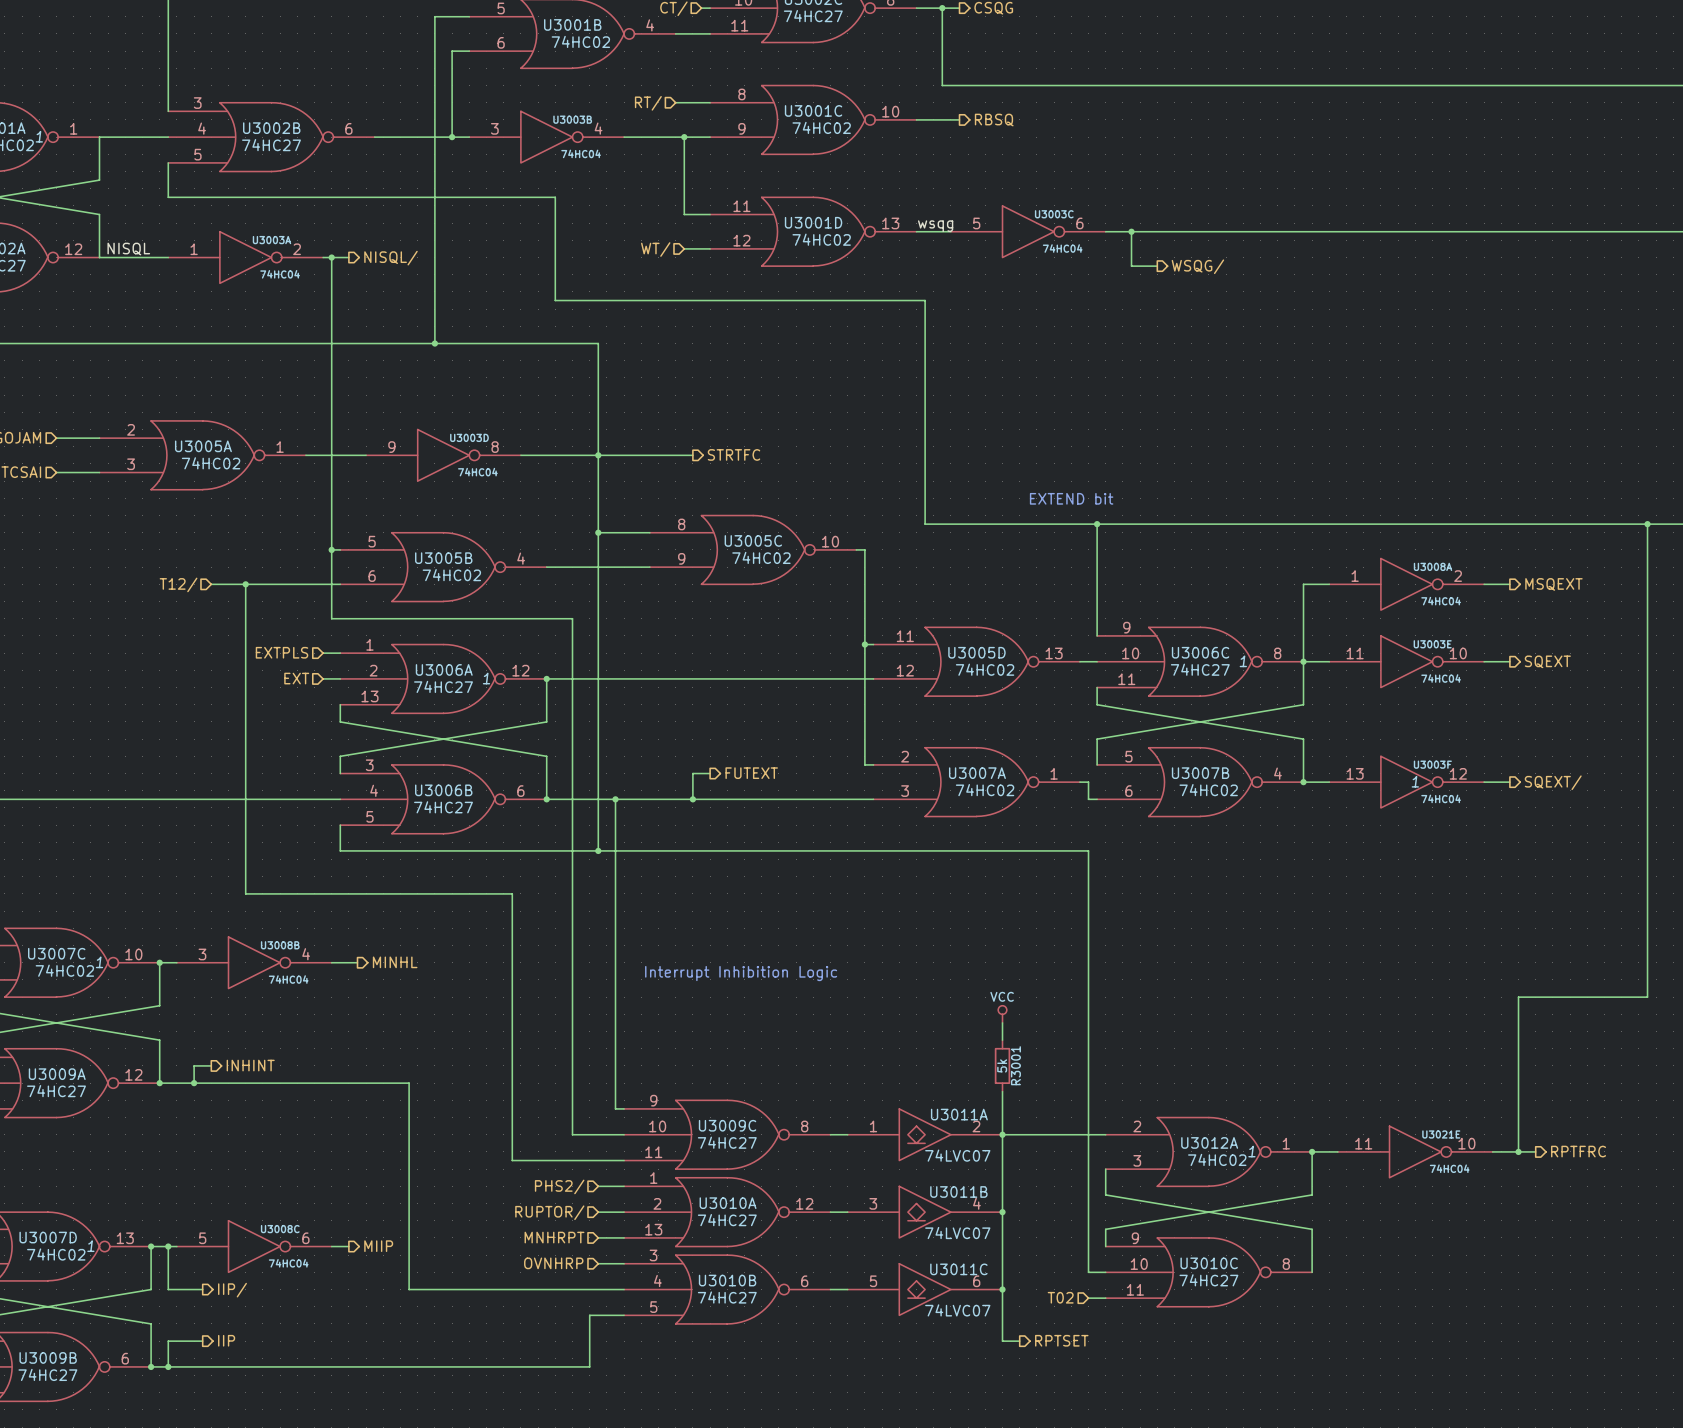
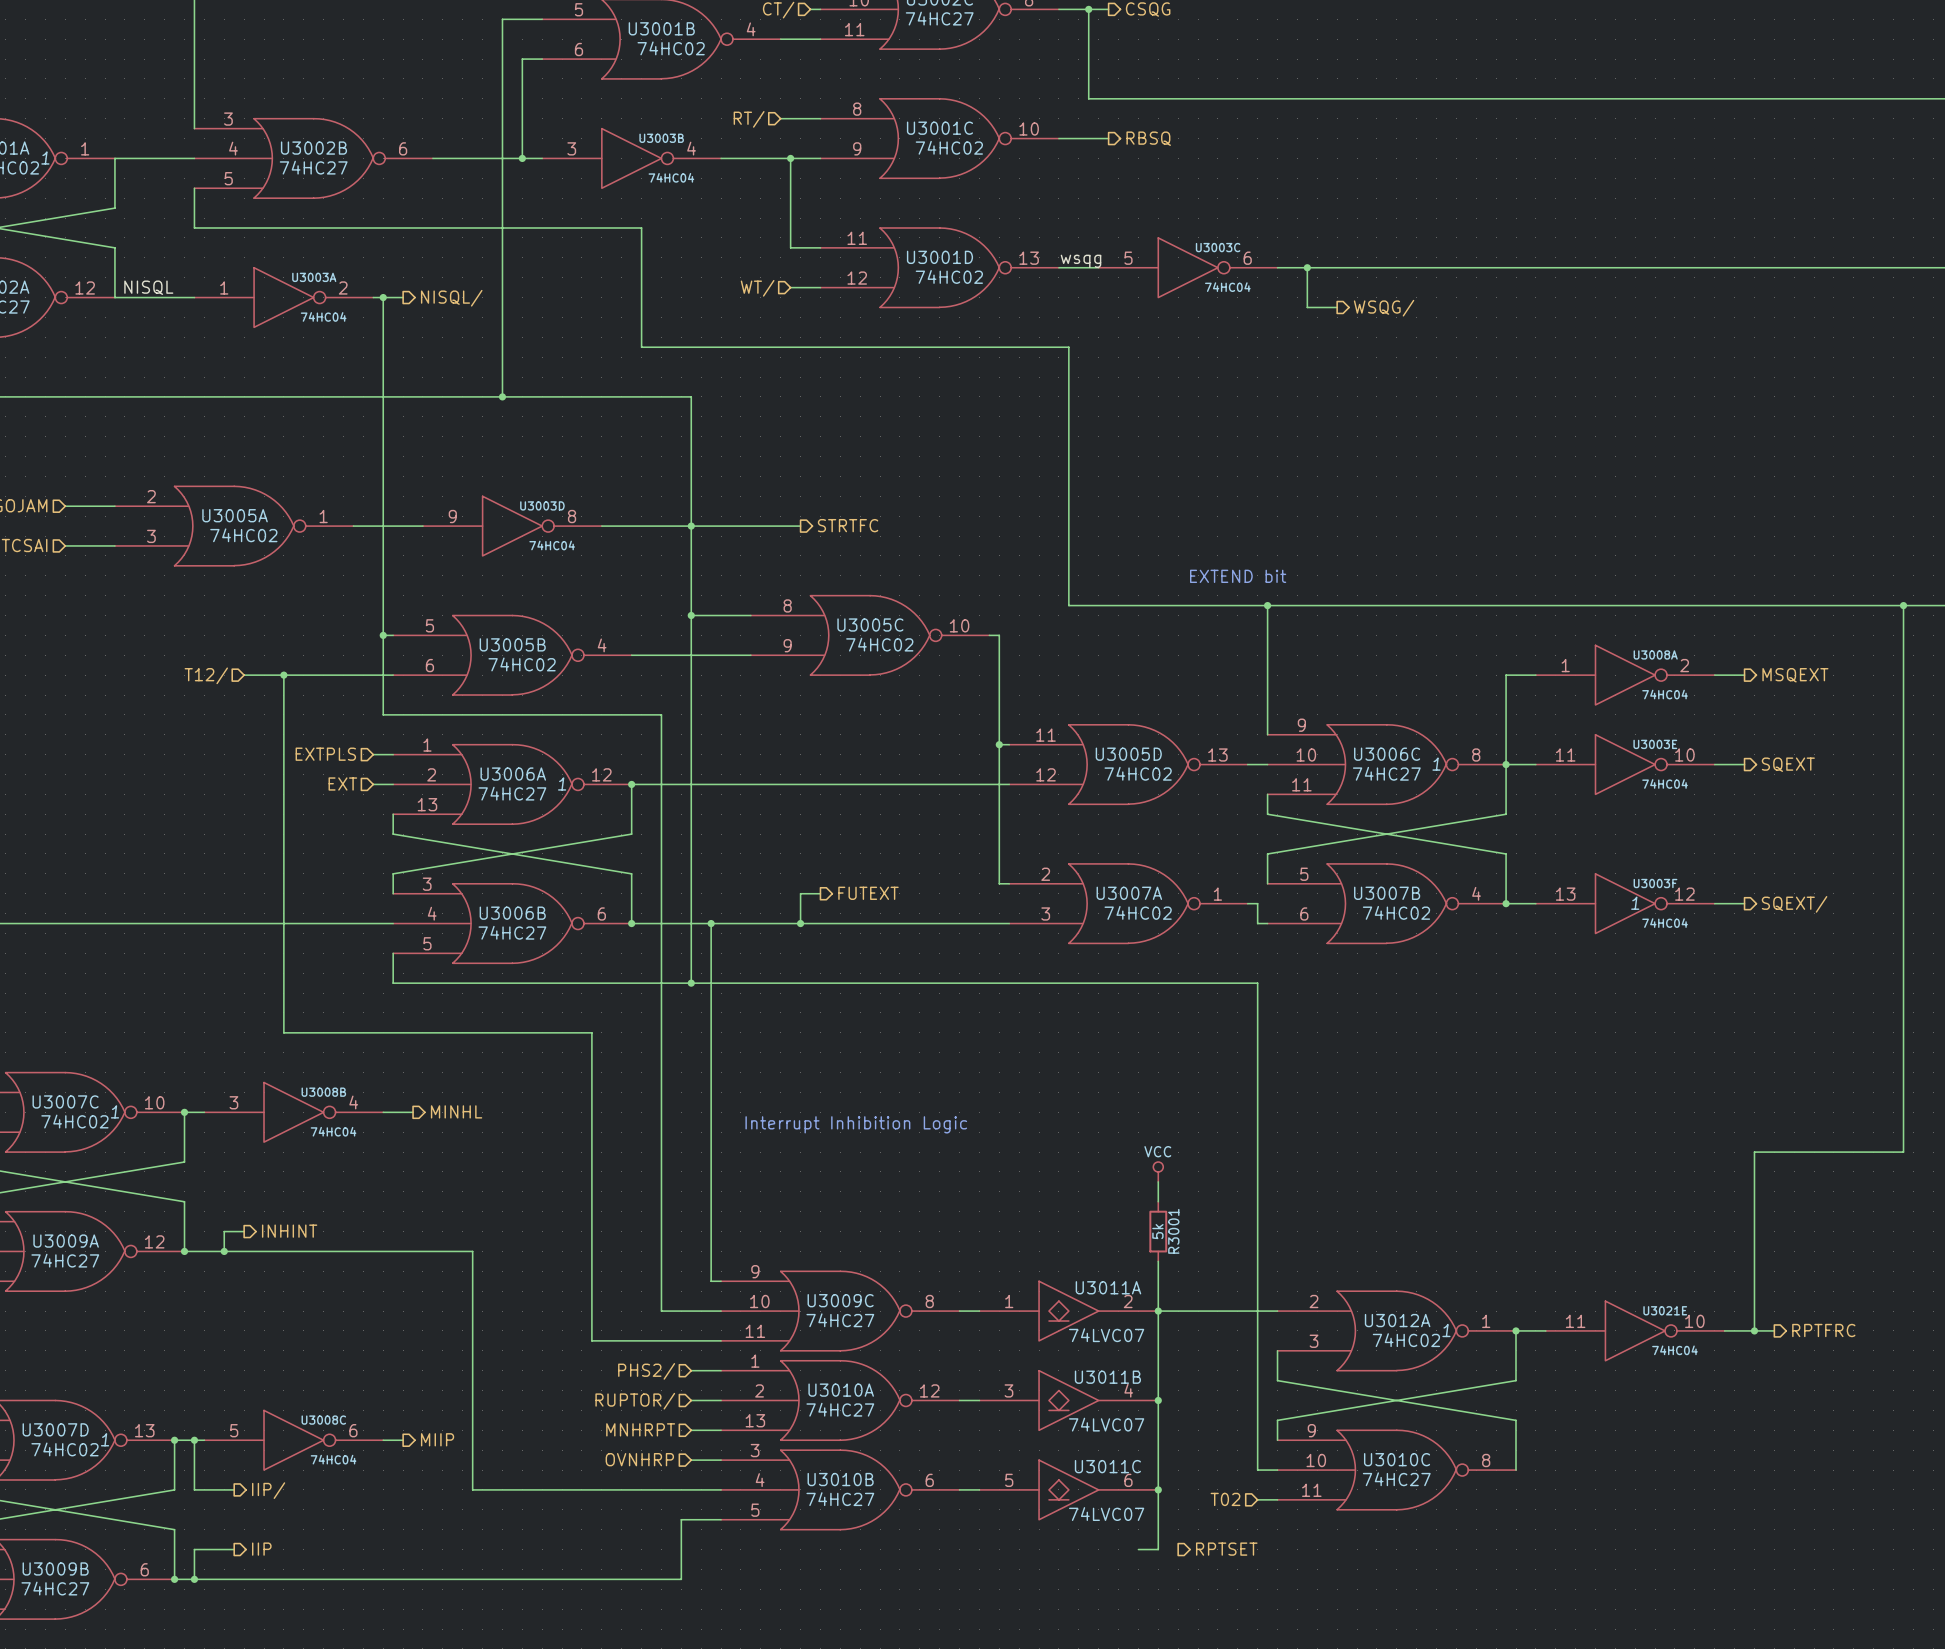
wire: (1002, 1341) (1019, 1341) -> (1158, 1549) (1138, 1549)

